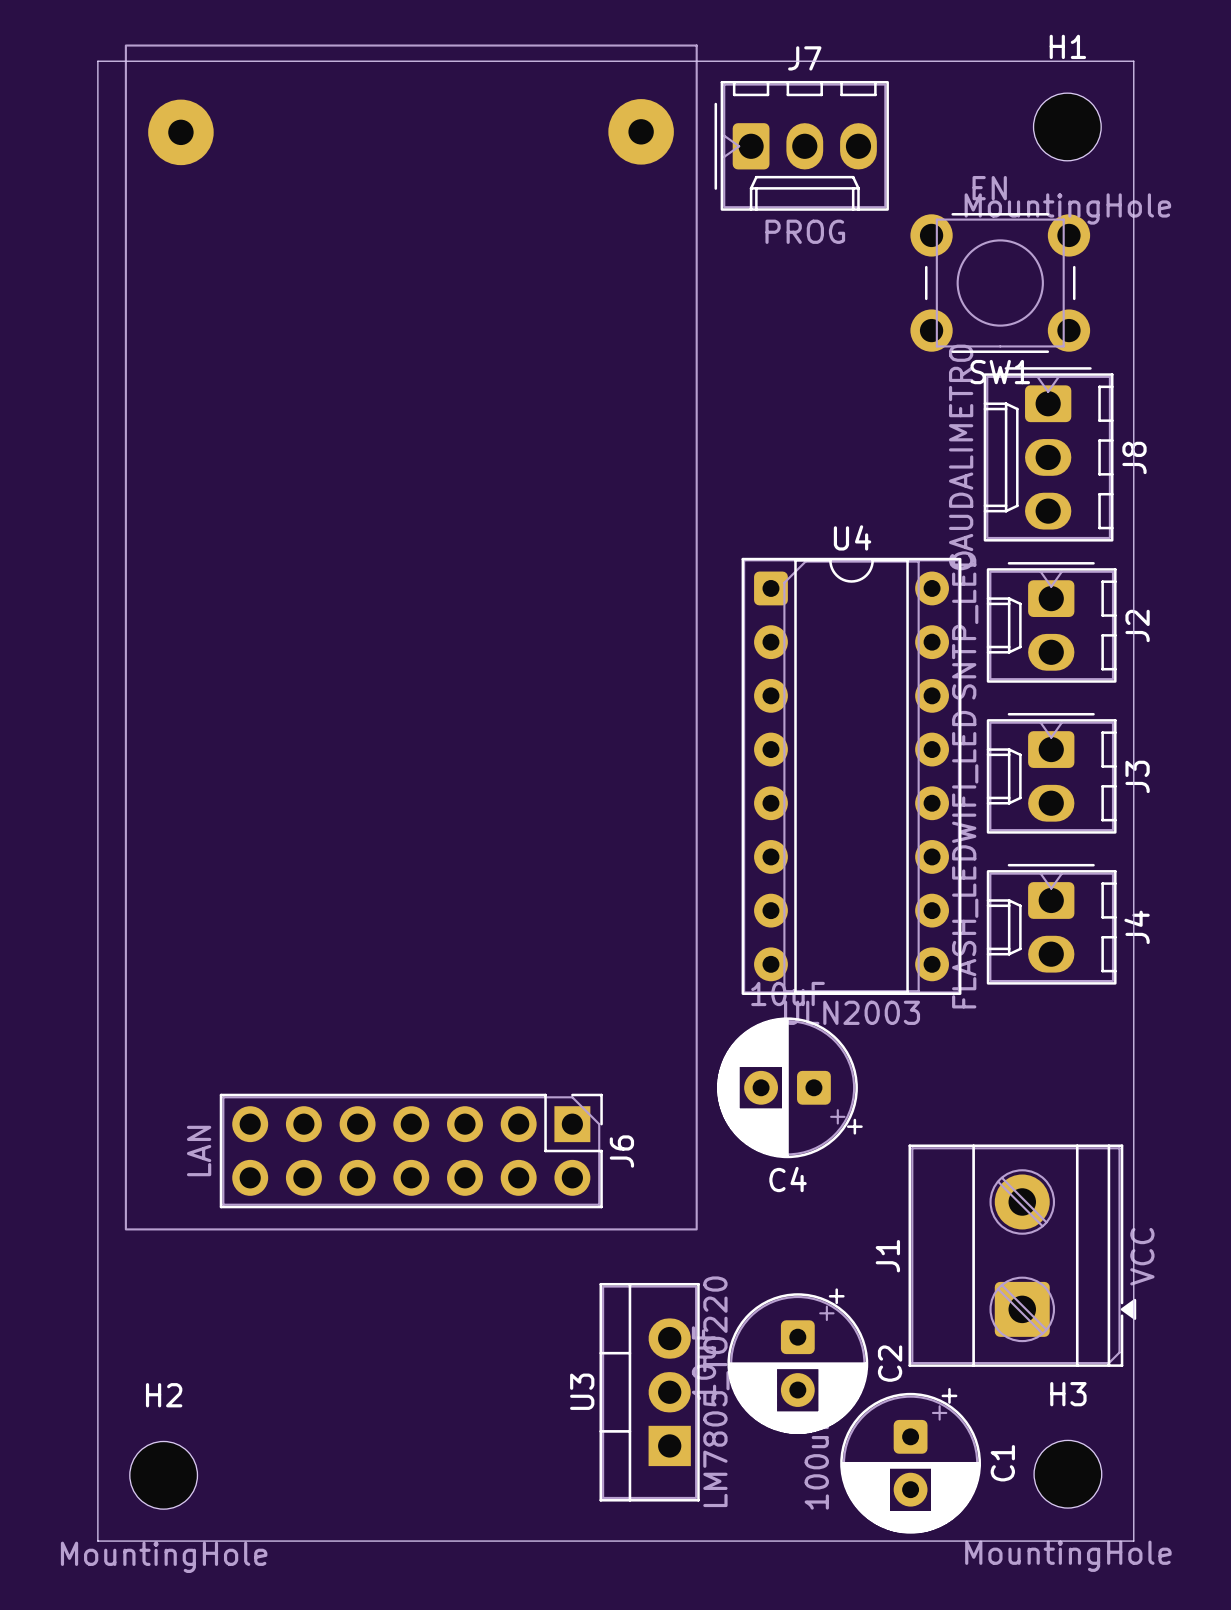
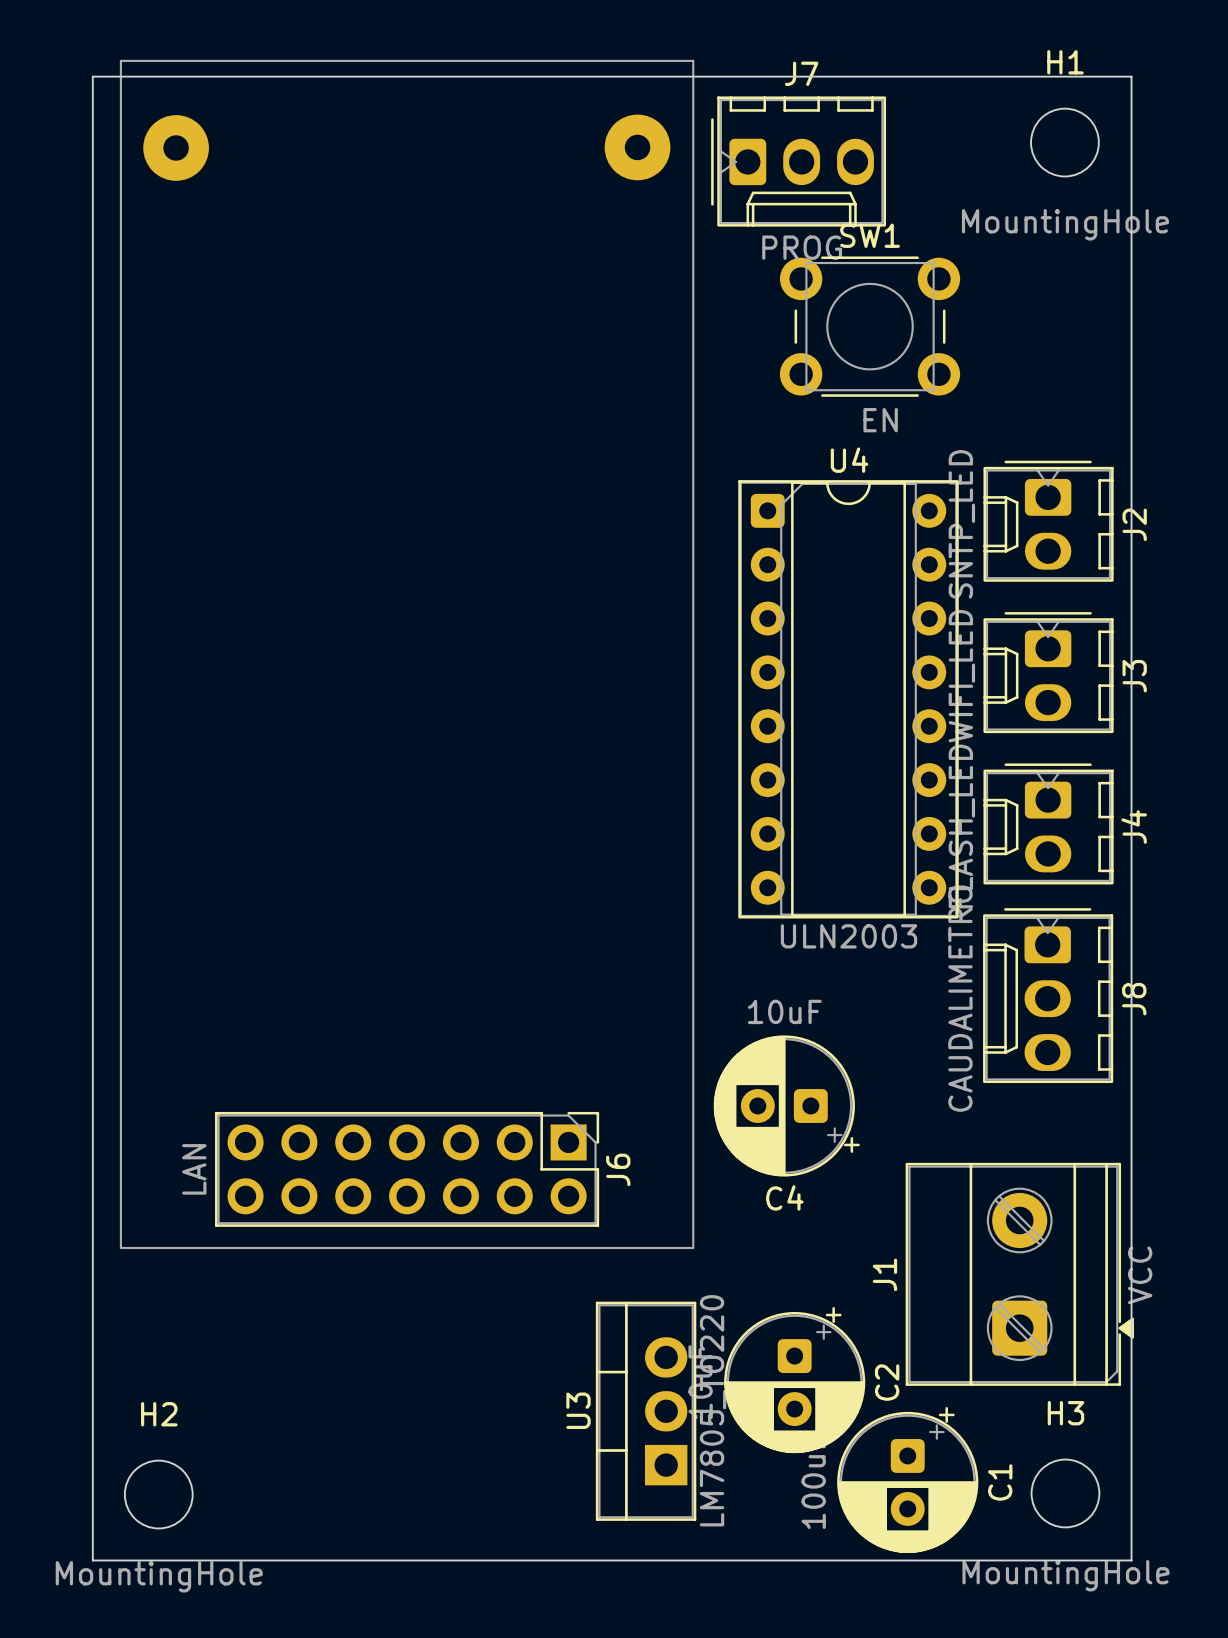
SW1 rotation: 0° (1000, 283) -> 180° (870, 326)
SW1 position: (1000, 283) -> (870, 326)
J8 position: (1048, 454) -> (1048, 995)
J2 position: (1051, 622) -> (1048, 521)
J3 position: (1051, 773) -> (1048, 672)
U4 position: (851, 776) -> (848, 699)
J4 position: (1051, 924) -> (1048, 823)

